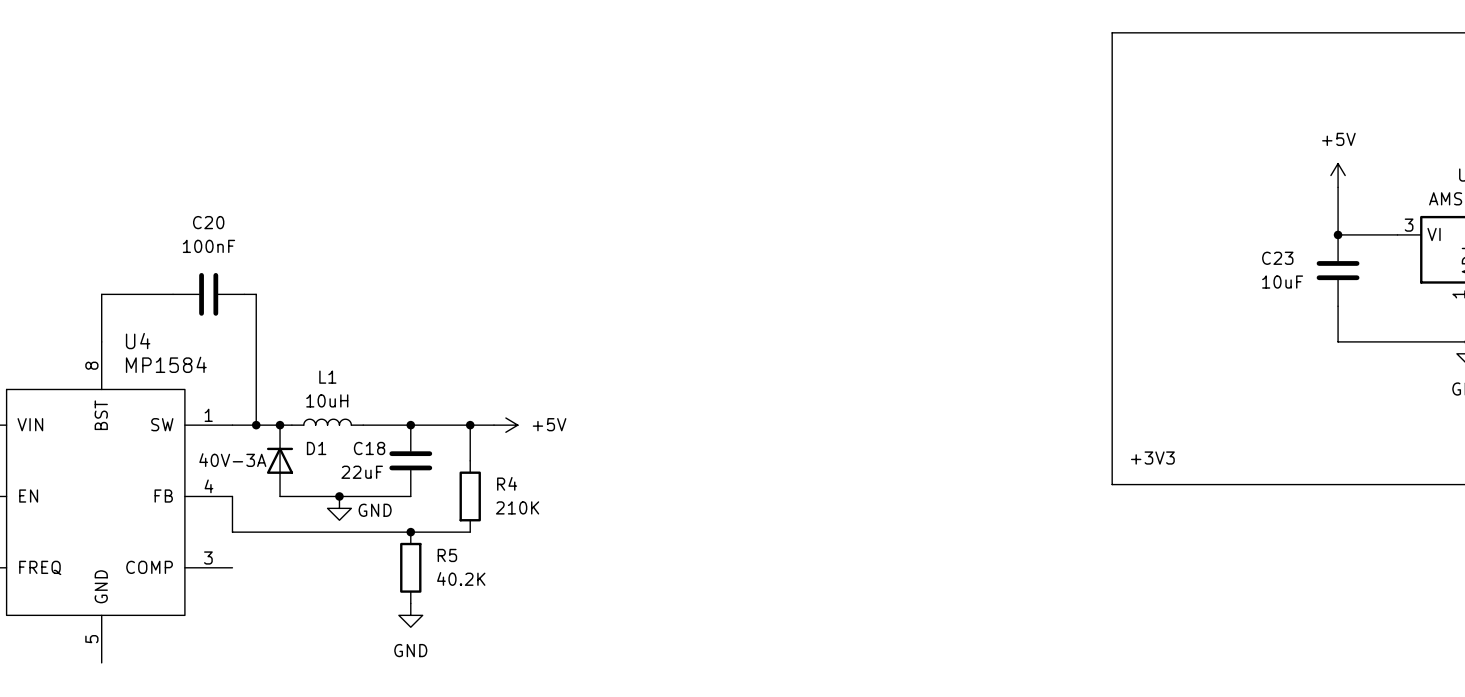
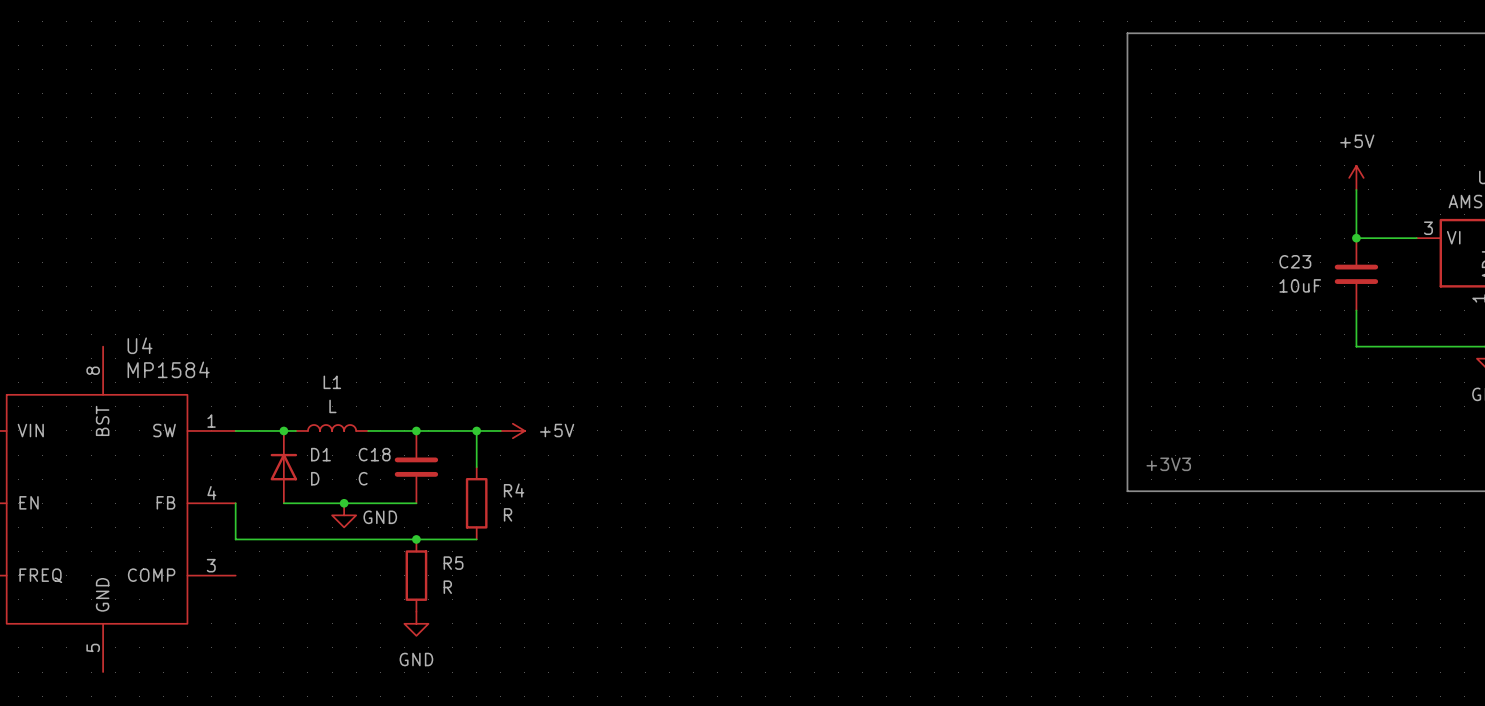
wire: (173, 294) (101, 294) (101, 341) -> none
C20: 100nF (208, 294) -> none
wire: (244, 294) (256, 294) (256, 425) -> none
L1 value: 10uH (327, 400) -> L (332, 406)
junction: (256, 425) -> none
D1 value: 40V-3A (232, 460) -> D (315, 478)
C18 value: 22uF (362, 472) -> C (363, 478)
R4 value: 210K (517, 507) -> R (508, 514)
R5 value: 40.2K (461, 578) -> R (447, 587)

